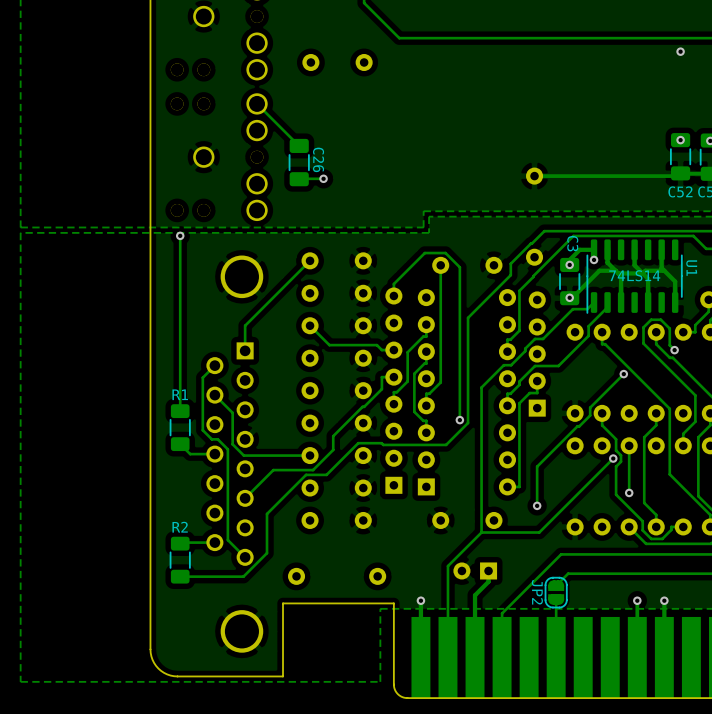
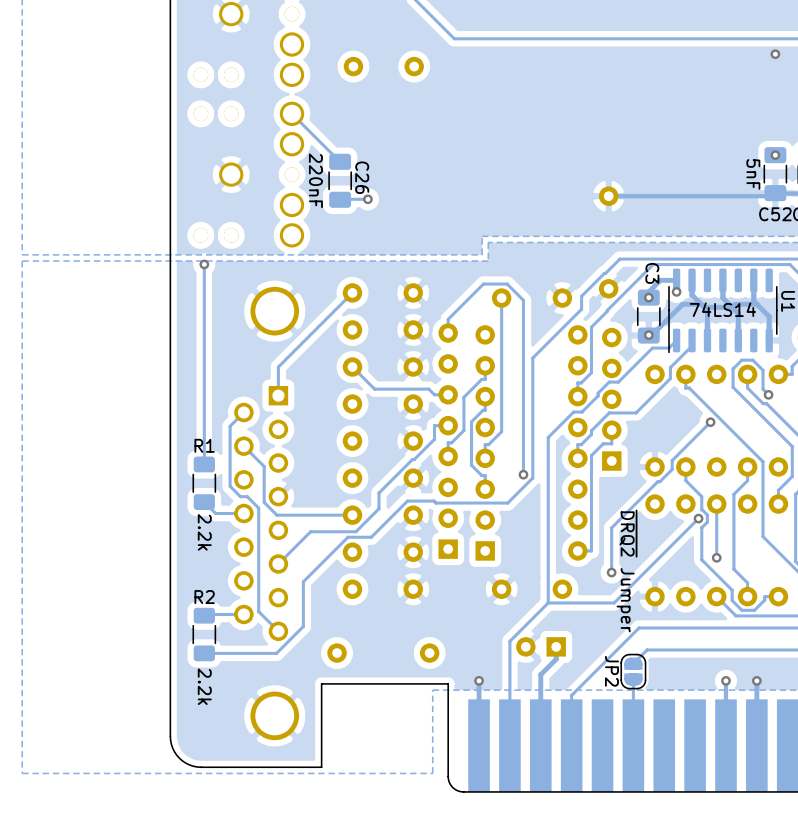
C52 value: none -> 5nF (753, 174)
C26 value: none -> 220nF (315, 180)
R1 value: none -> 2.2k (204, 532)
JP2 value: none -> ~{DRQ2} Jumper (627, 571)
R2 value: none -> 2.2k (204, 686)

